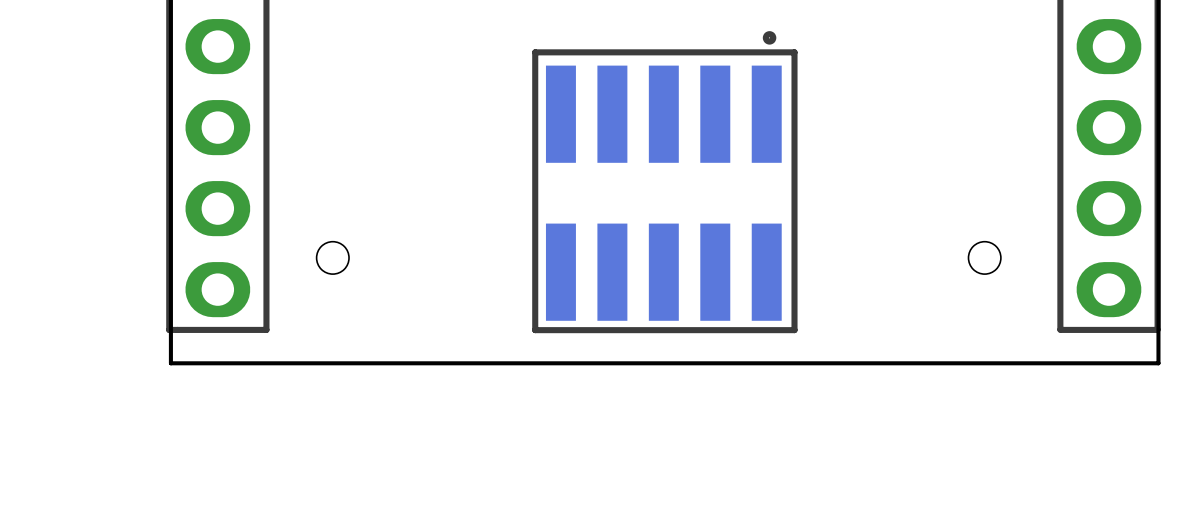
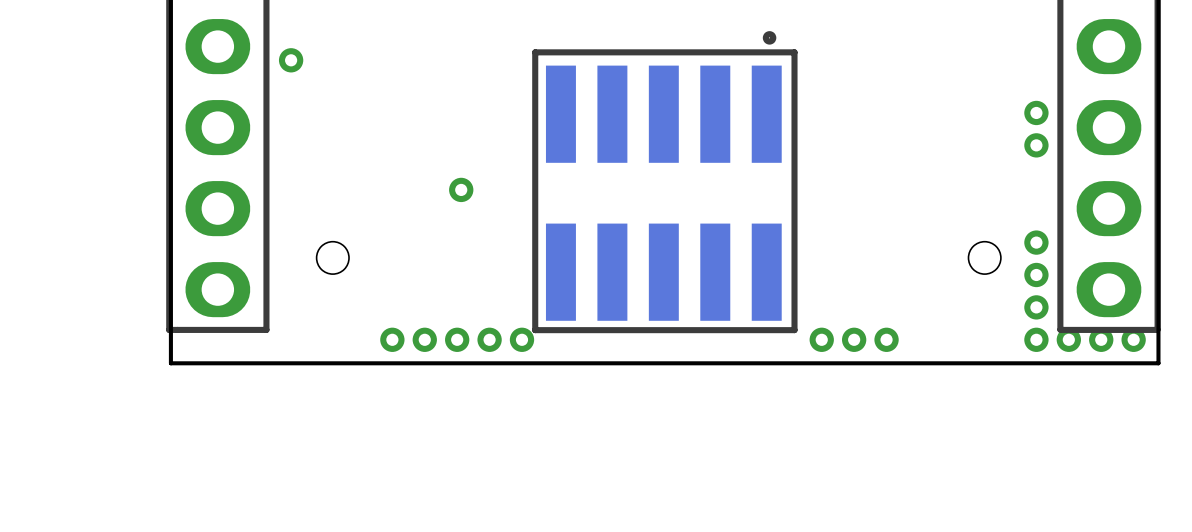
part: none -> (291, 60)
part: none -> (1036, 112)
part: none -> (1036, 145)
part: none -> (461, 189)
part: none -> (1036, 242)
part: none -> (1036, 274)
part: none -> (1036, 307)
part: none -> (392, 339)
part: none -> (424, 339)
part: none -> (457, 339)
part: none -> (489, 339)
part: none -> (521, 339)
part: none -> (821, 339)
part: none -> (854, 339)
part: none -> (886, 339)
part: none -> (1036, 339)
part: none -> (1068, 339)
part: none -> (1101, 339)
part: none -> (1133, 339)

